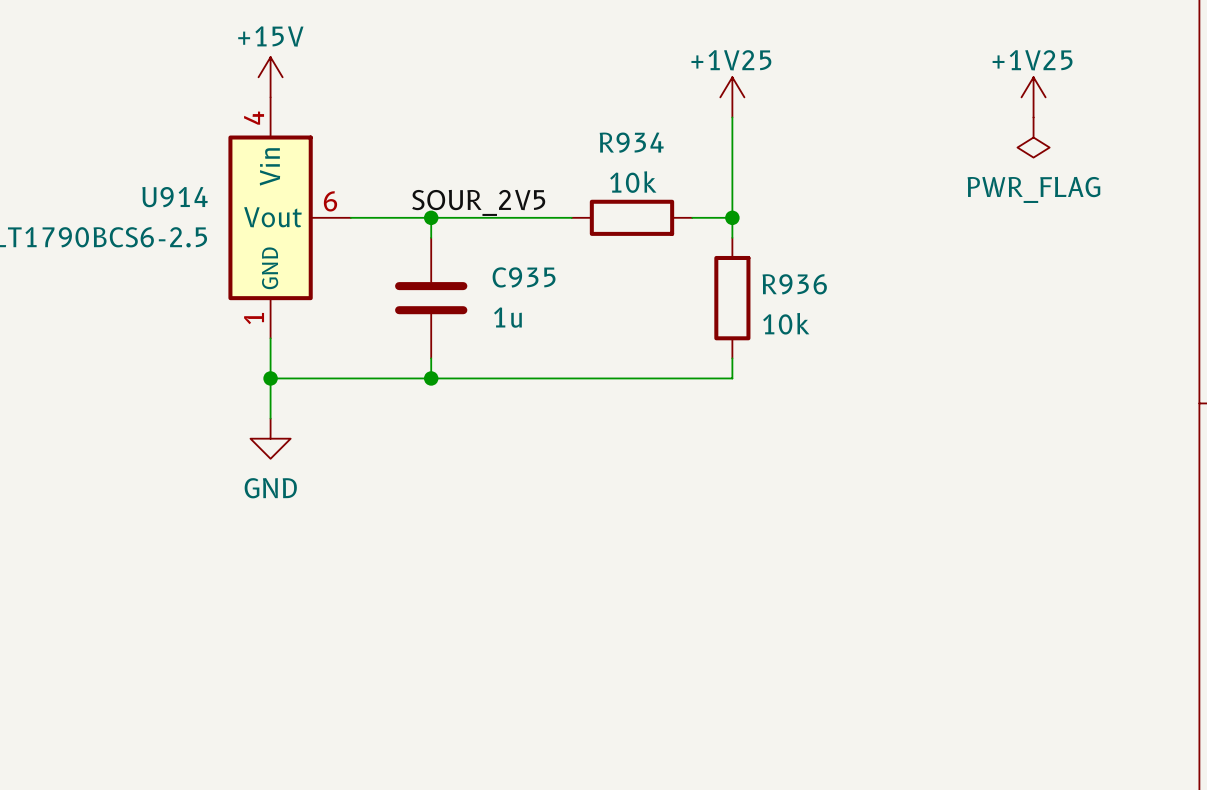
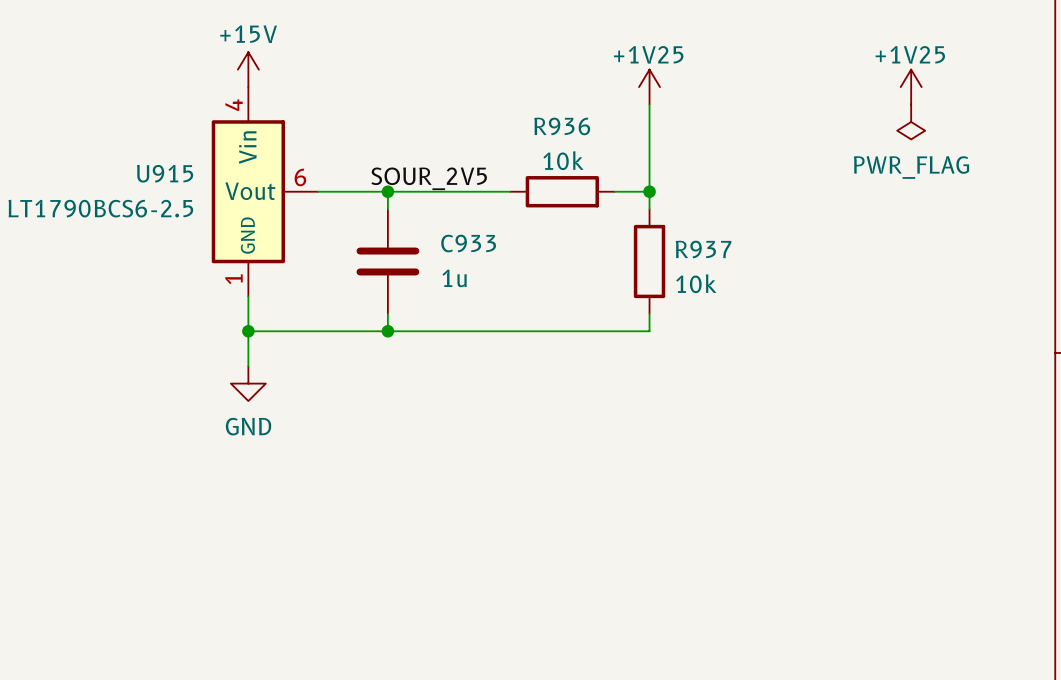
R934 name: R934 (631, 142) -> R936 (562, 126)
U914 name: U914 (175, 197) -> U915 (165, 173)
C935 name: C935 (524, 277) -> C933 (468, 243)
R936 name: R936 (794, 284) -> R937 (703, 249)

